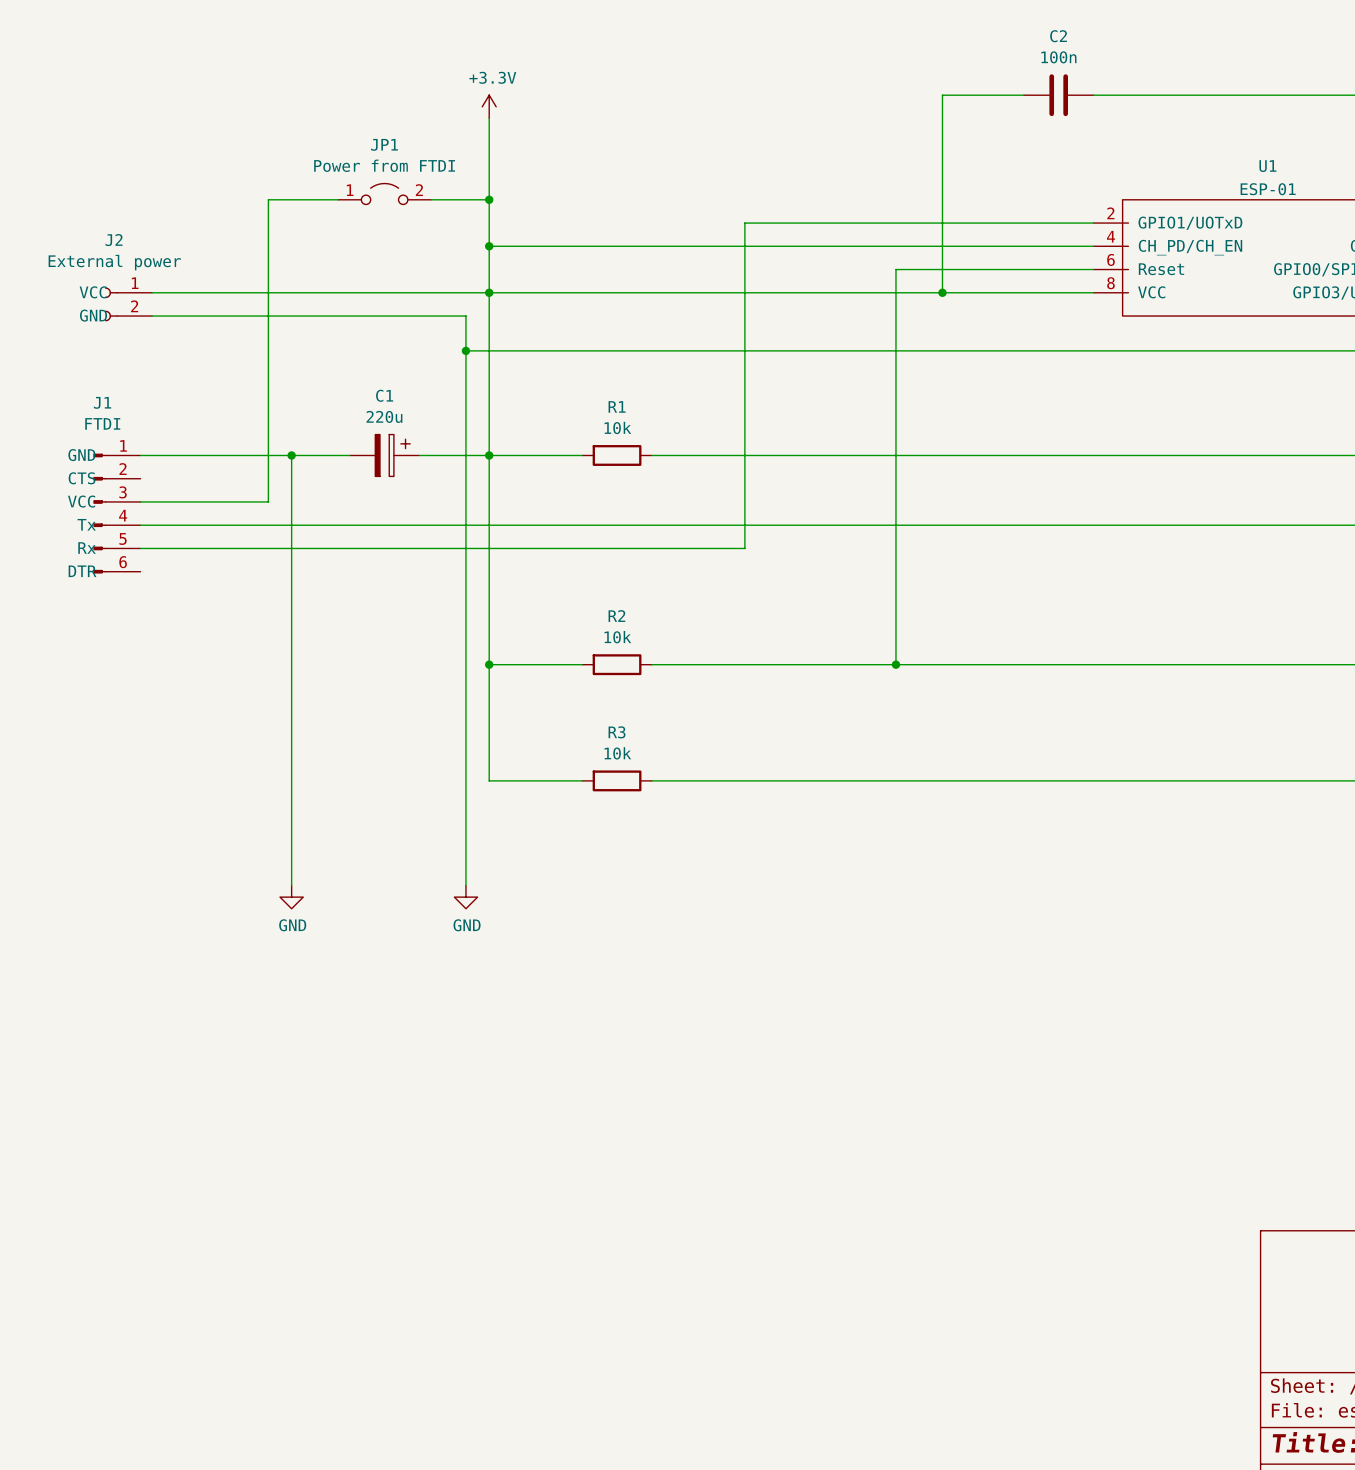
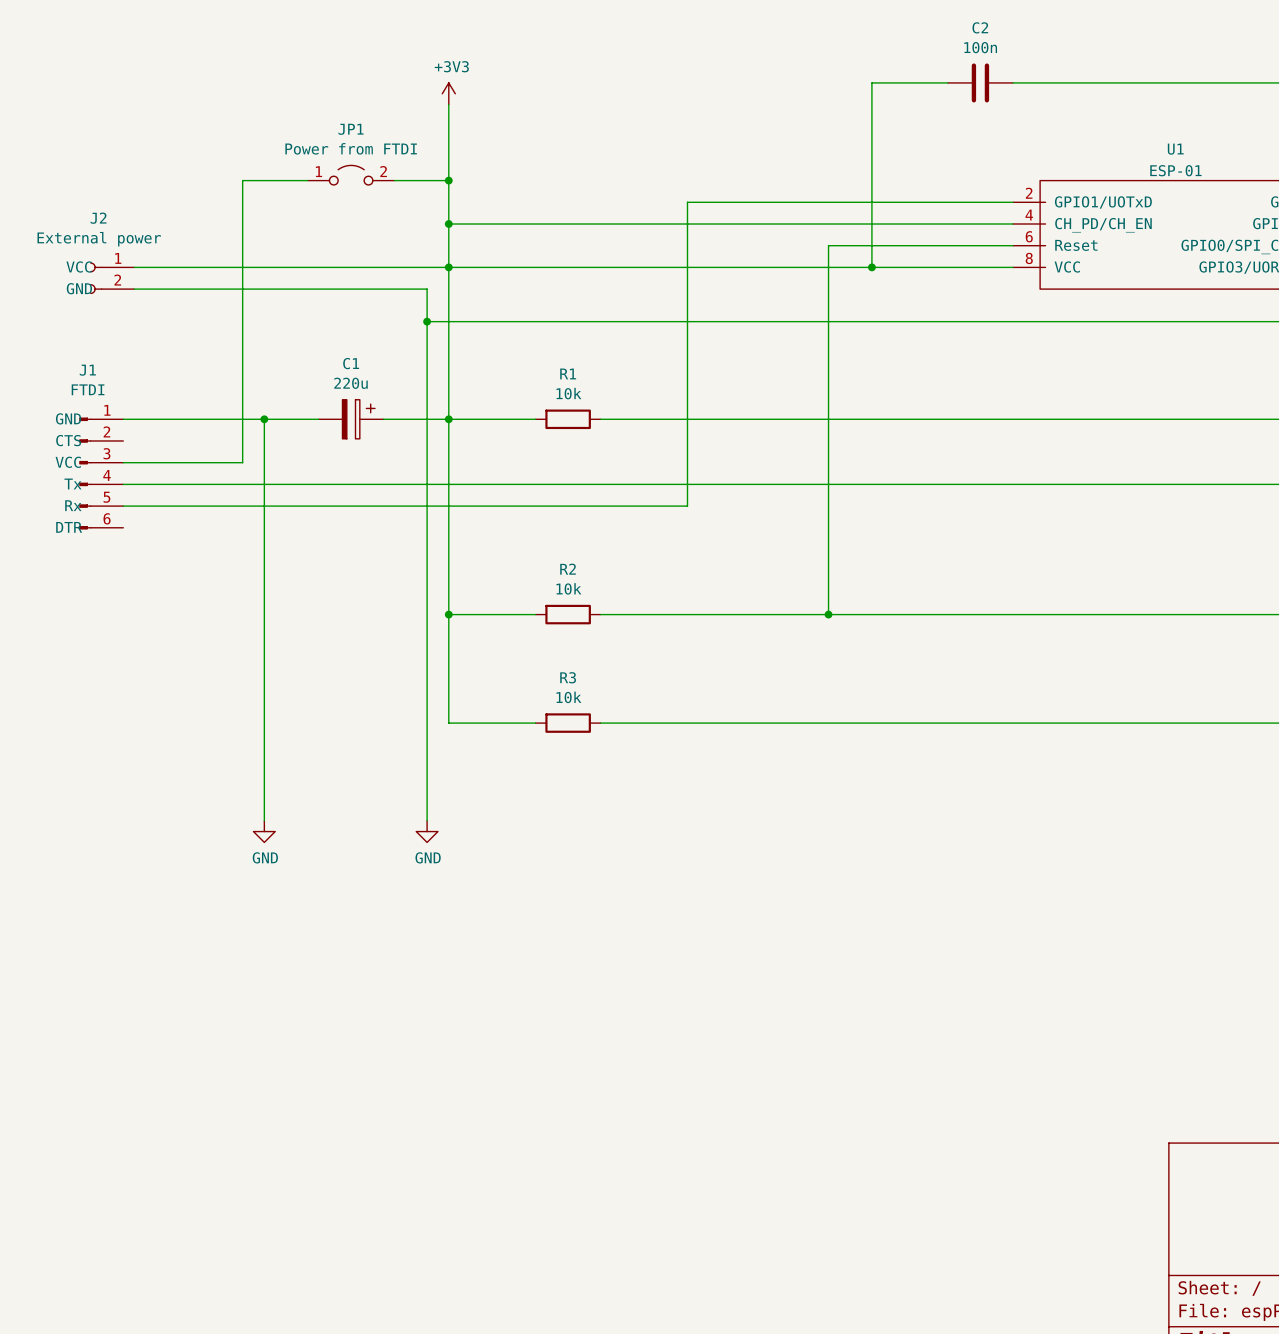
power symbol: +3.3V (489, 106) -> +3V3 (448, 93)

